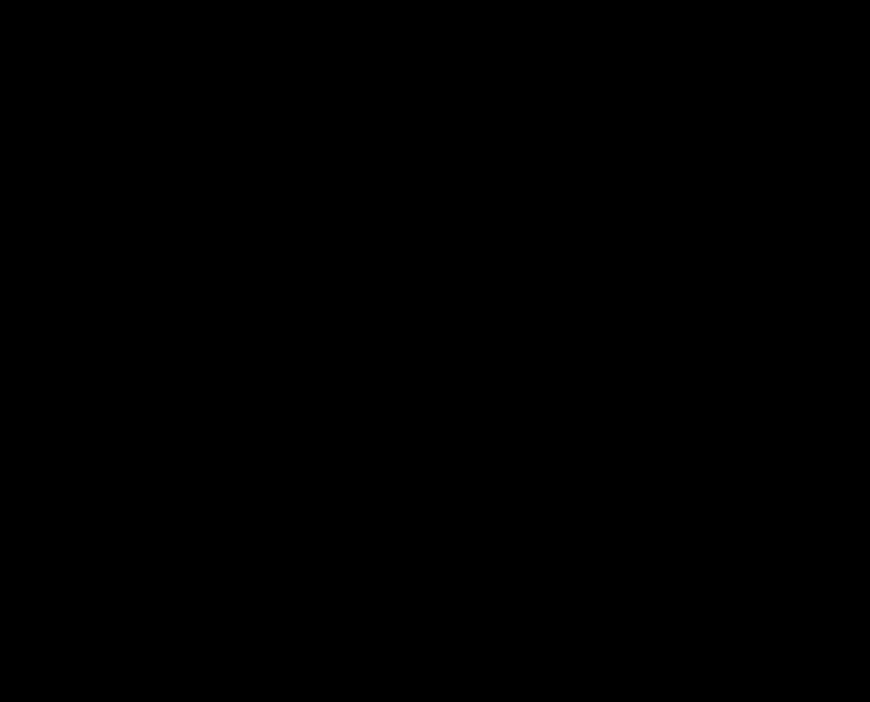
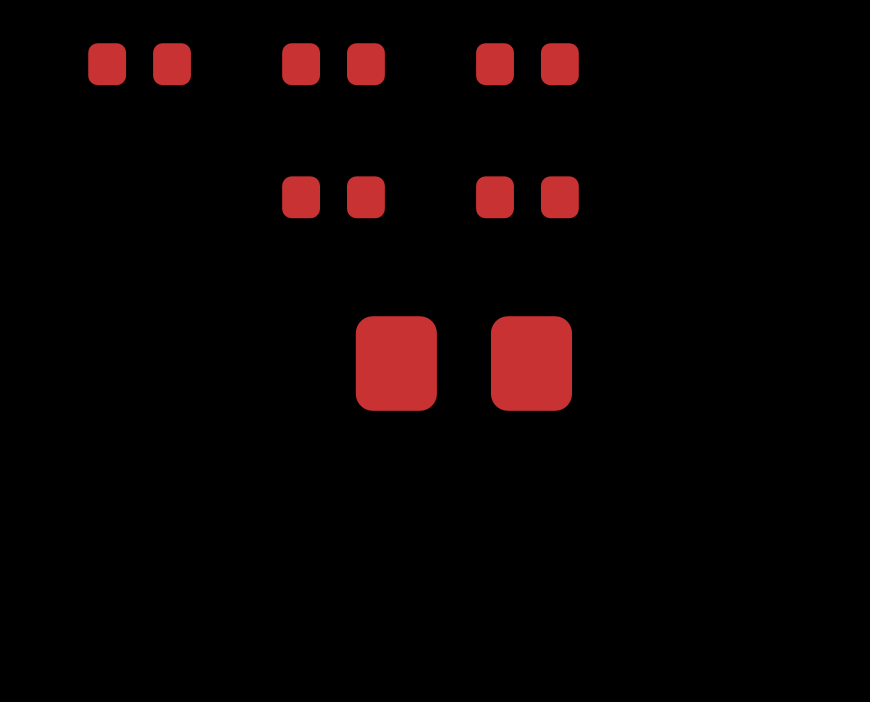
part: none -> (139, 64)
part: none -> (333, 64)
part: none -> (527, 64)
part: none -> (333, 197)
part: none -> (527, 197)
part: none -> (463, 363)

